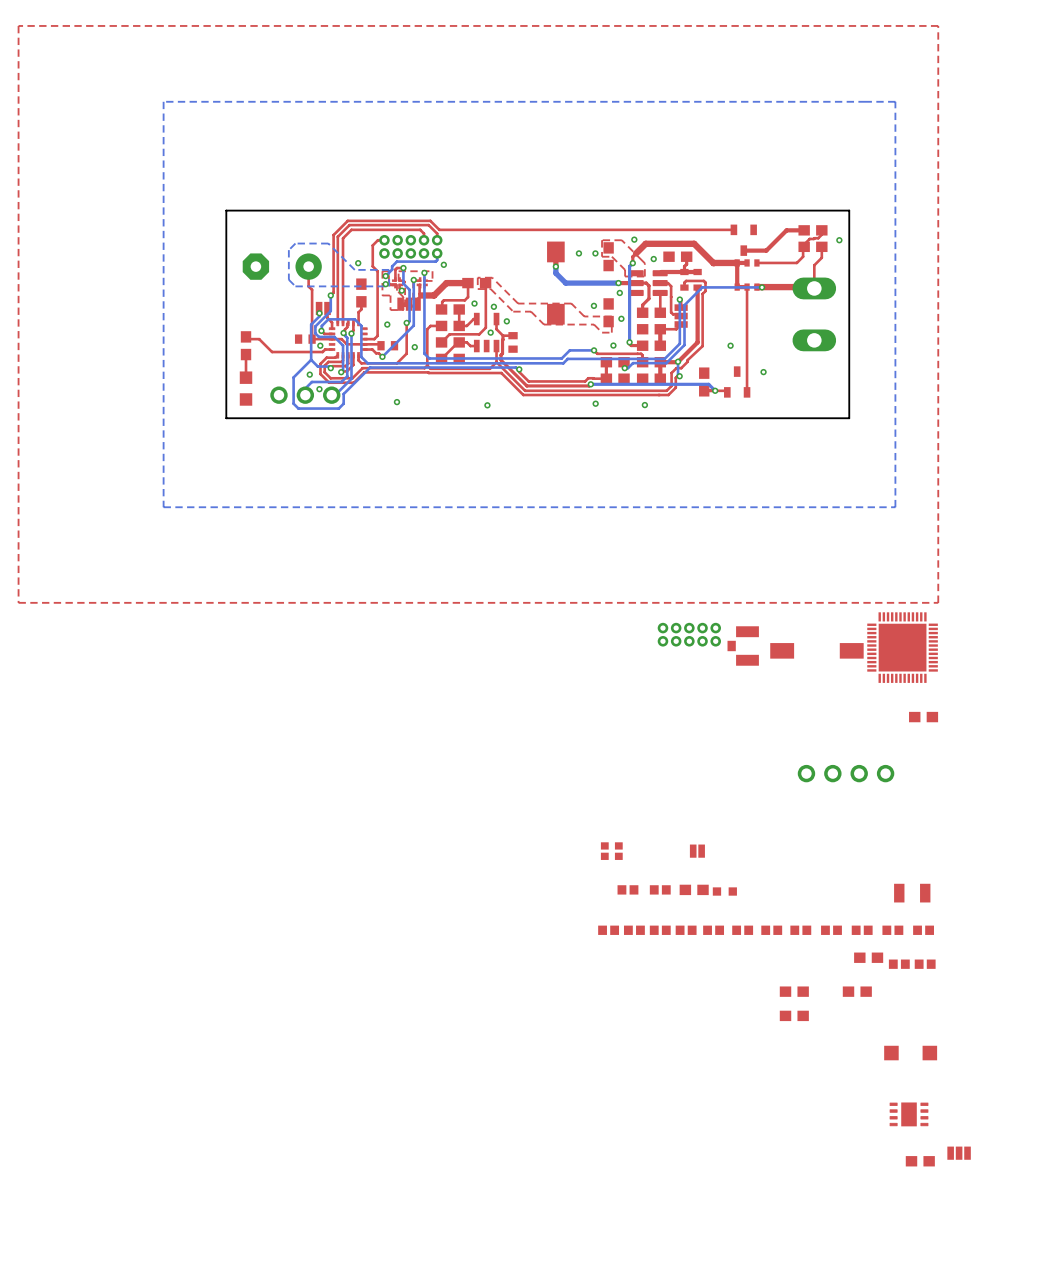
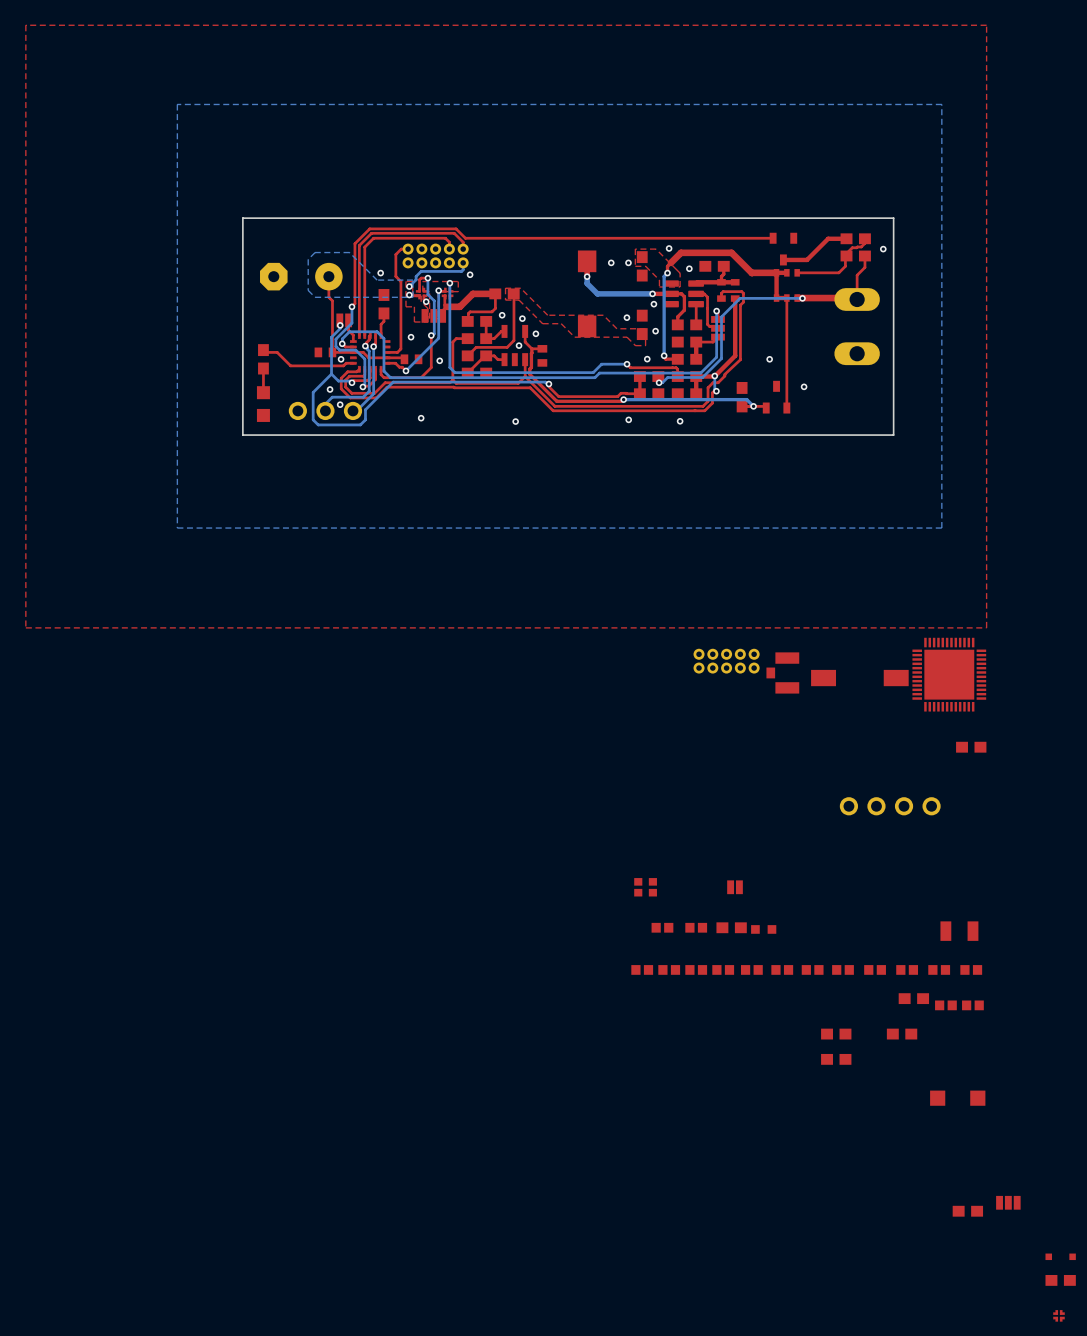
part: (909, 1114) -> none
part: none -> (1060, 1256)
part: none -> (1060, 1280)
part: none -> (1058, 1315)

